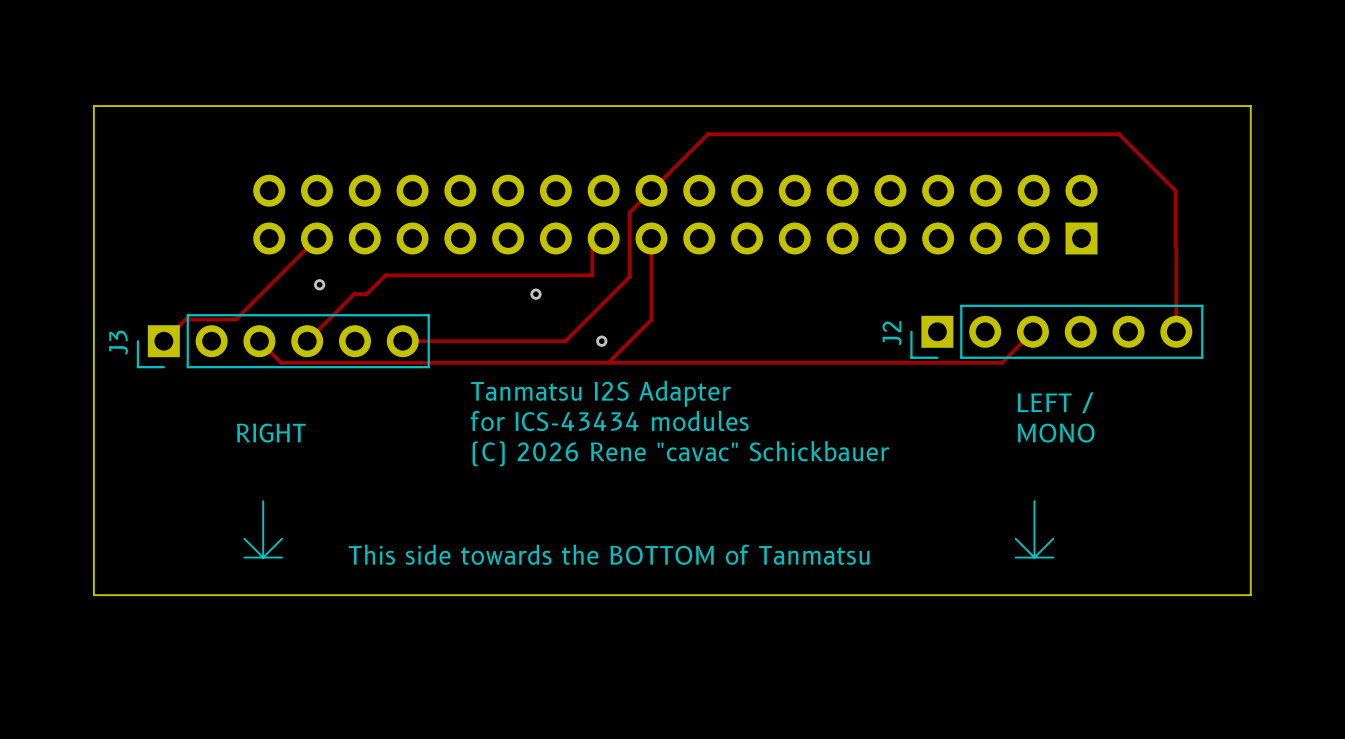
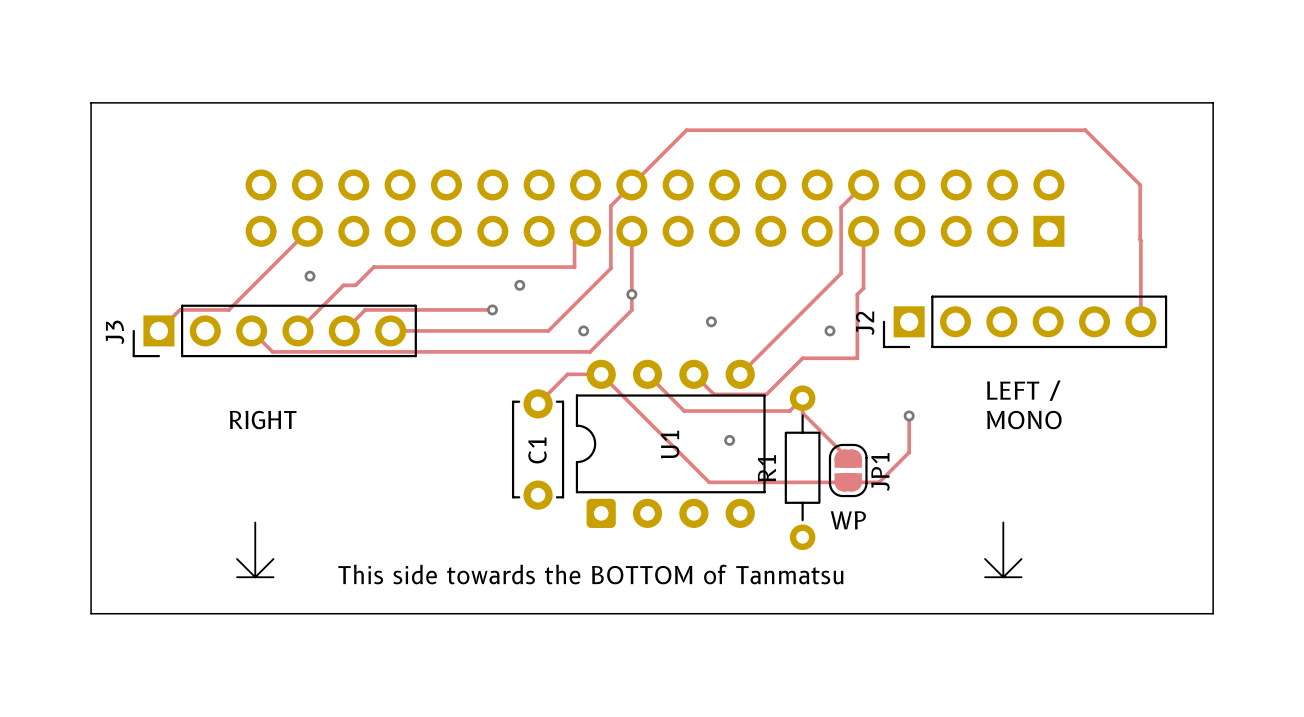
track: none -> (863, 184) (841, 207) (841, 273) (740, 374)
track: none -> (863, 231) (863, 288) (857, 294) (857, 358) (802, 358) (766, 394) (713, 394) (693, 374)
via: none -> (631, 294)
track: none -> (492, 309) (365, 309) (344, 330)
via: none -> (492, 309)
via: none -> (711, 321)
track: (1032, 331) (1001, 362) (608, 362) -> none
via: none -> (829, 330)
track: none -> (647, 374) (684, 411) (789, 411) (802, 398) (802, 413) (848, 458)
text: Tanmatsu I2S Adapter (600, 393) -> none
track: none -> (538, 403) (567, 374) (601, 374) (709, 482) (879, 482) (909, 452) (909, 415)
text: for ICS-43434 modules (609, 420) -> none
via: none -> (909, 415)
text: (C) 2026 Rene "cavac" Schickbauer (680, 453) -> none
via: none -> (729, 440)
U1: none -> (670, 443)
C1: none -> (538, 449)
R1: none -> (802, 467)
JP1: none -> (848, 470)
line: (263, 501) (263, 538) -> (255, 540) (255, 577)
line: (1034, 501) (1034, 538) -> (1003, 540) (1003, 577)
text: none -> WP (848, 520)
line: (244, 538) (263, 557) (282, 538) -> none
line: (1015, 538) (1034, 557) (1053, 538) -> none
text position: This side towards the BOTTOM of Tanmatsu (609, 554) -> This side towards the BOTTOM of Tanmatsu (590, 574)
line: (244, 557) (282, 557) -> (237, 577) (273, 577)
line: (1015, 557) (1053, 557) -> (985, 577) (1021, 577)
line: none -> (237, 558) (255, 577)
line: none -> (273, 558) (255, 577)
line: none -> (985, 558) (1003, 577)
line: none -> (1021, 558) (1003, 577)
board edge: (93, 595) (1250, 595) -> (91, 577) (91, 613) (1213, 613) (1213, 577)

